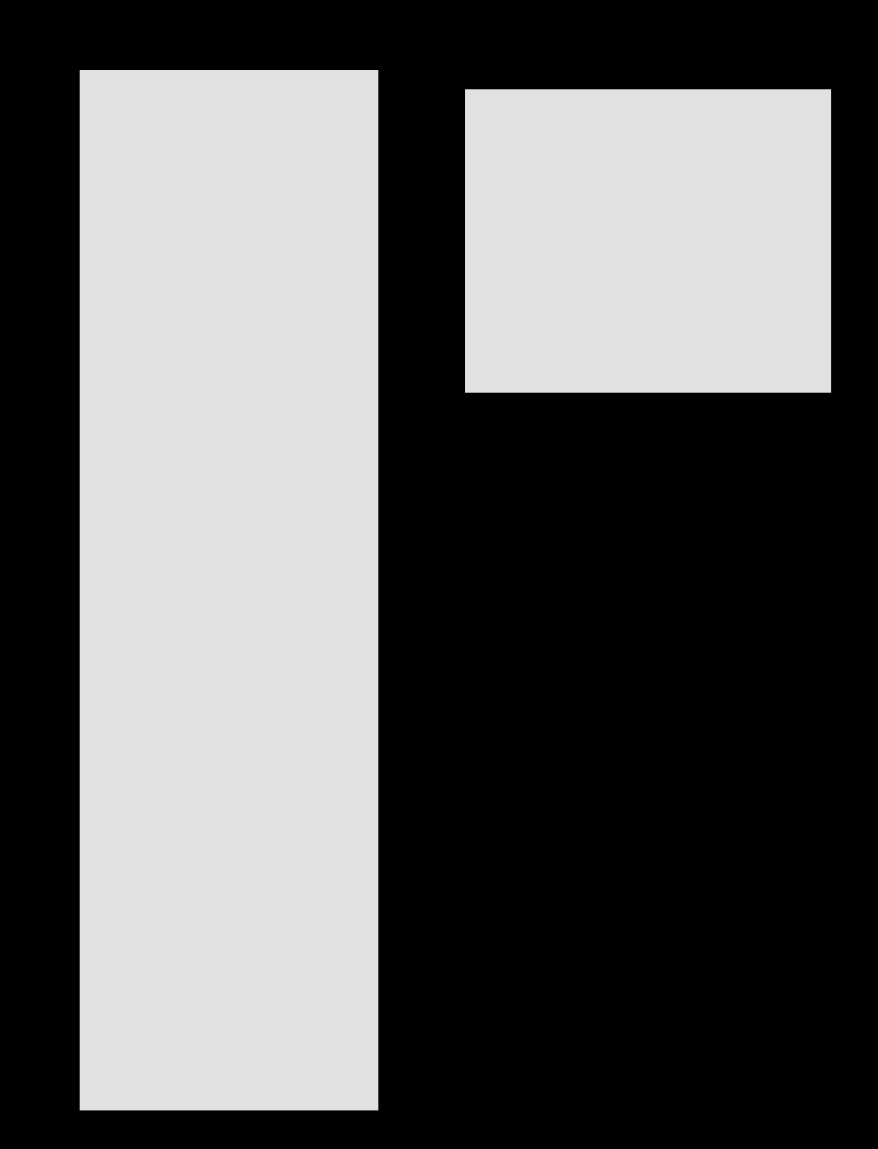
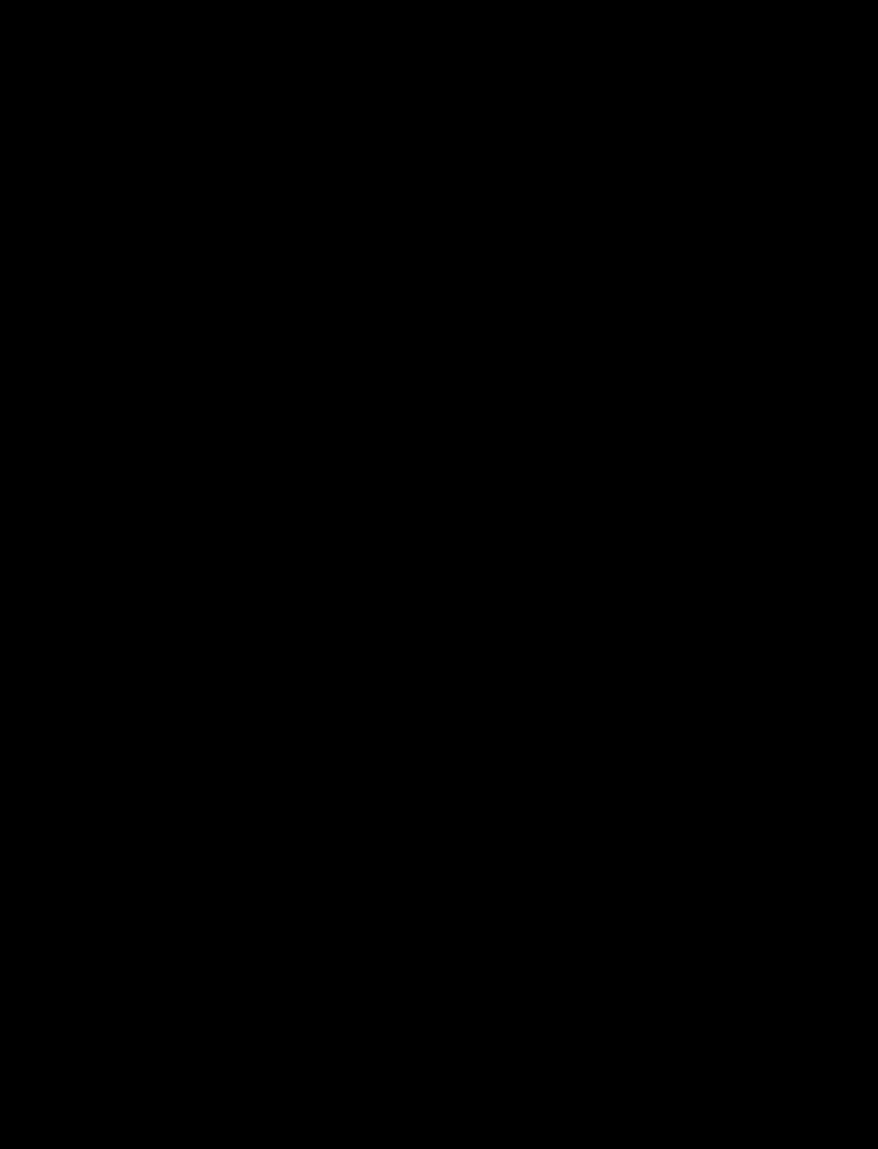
drawing: [79, 69, 379, 1111] -> none
drawing: [465, 89, 832, 393] -> none

